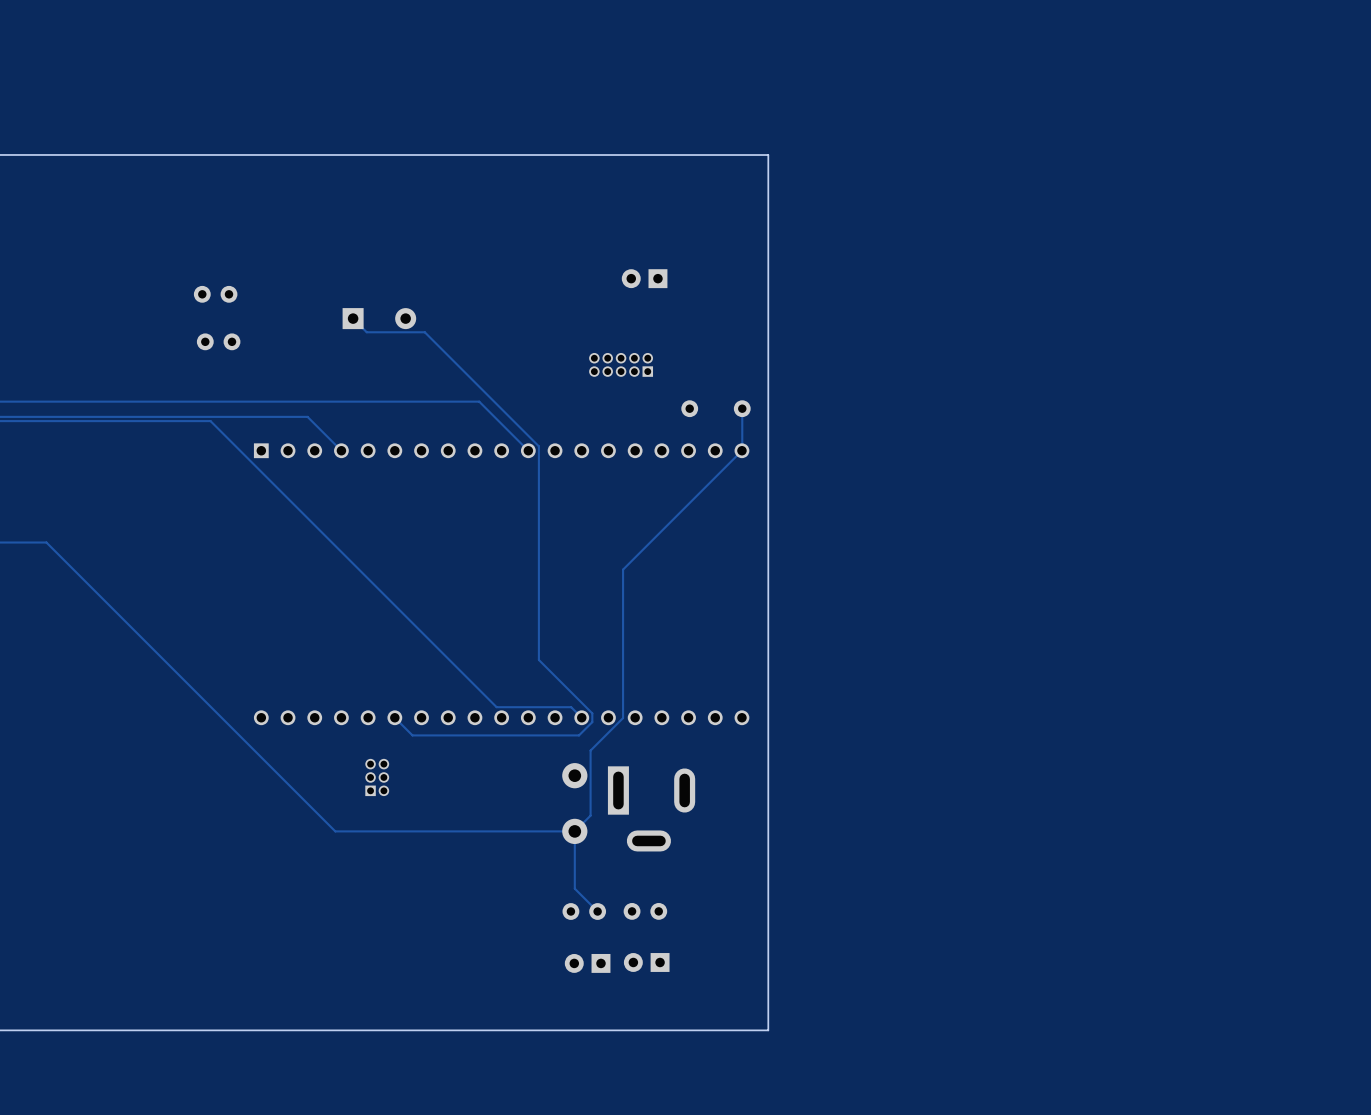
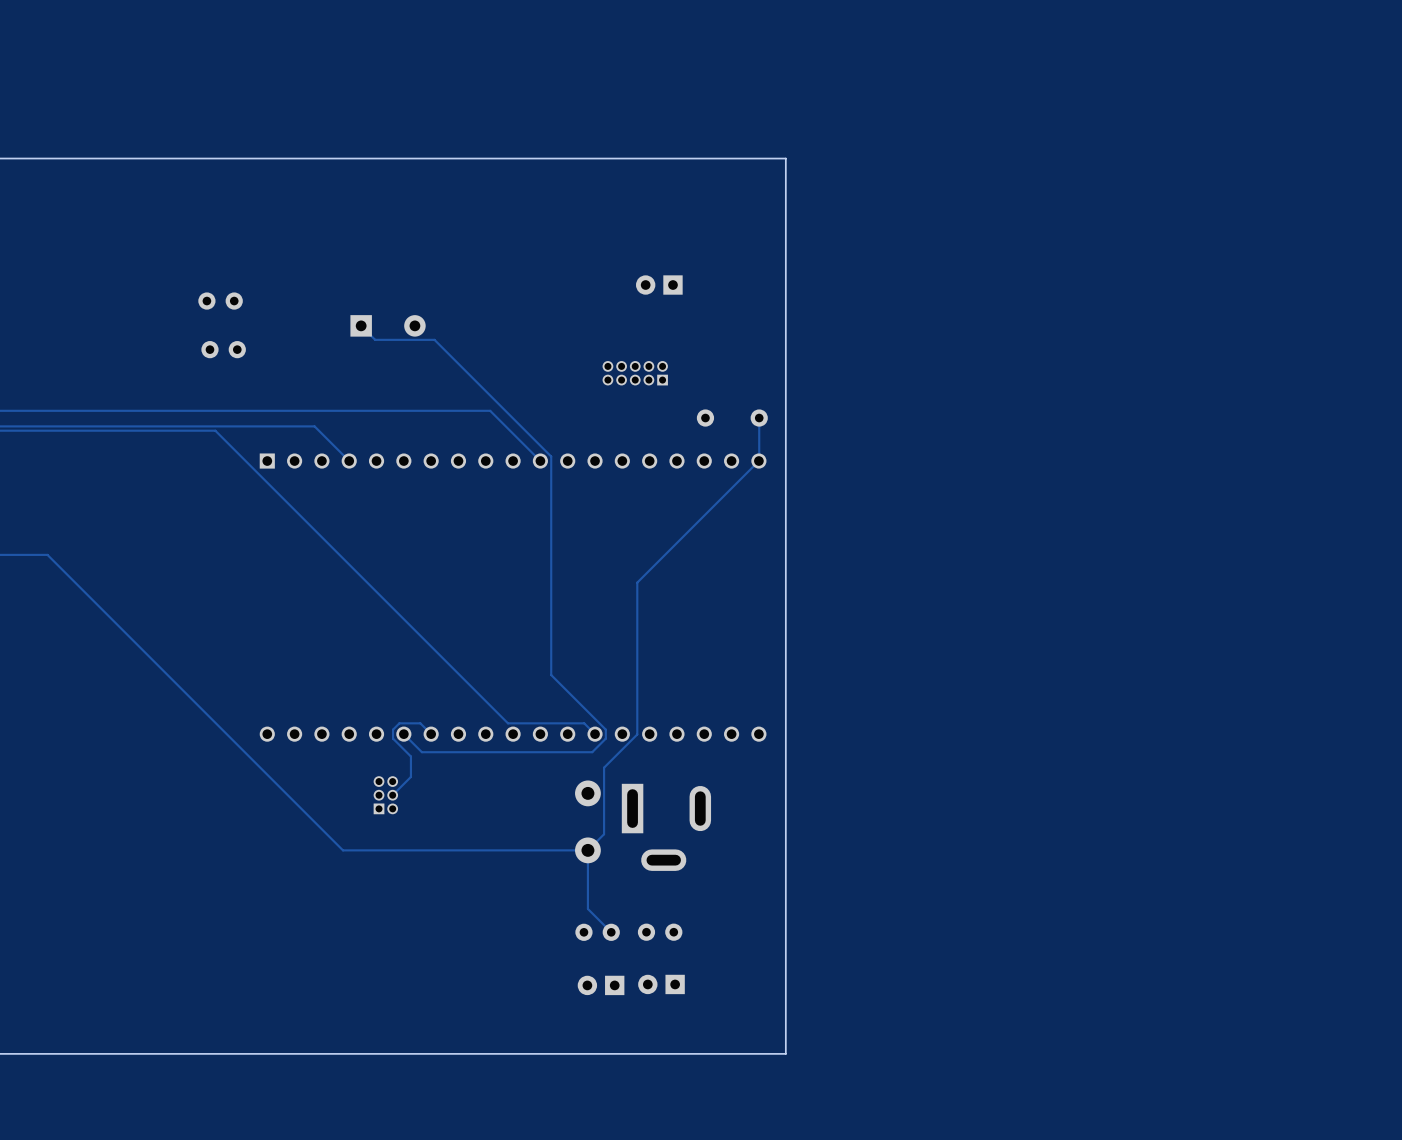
track: none -> (431, 734) (420, 723) (399, 723) (393, 729) (393, 738) (410, 756) (410, 776) (392, 795)

